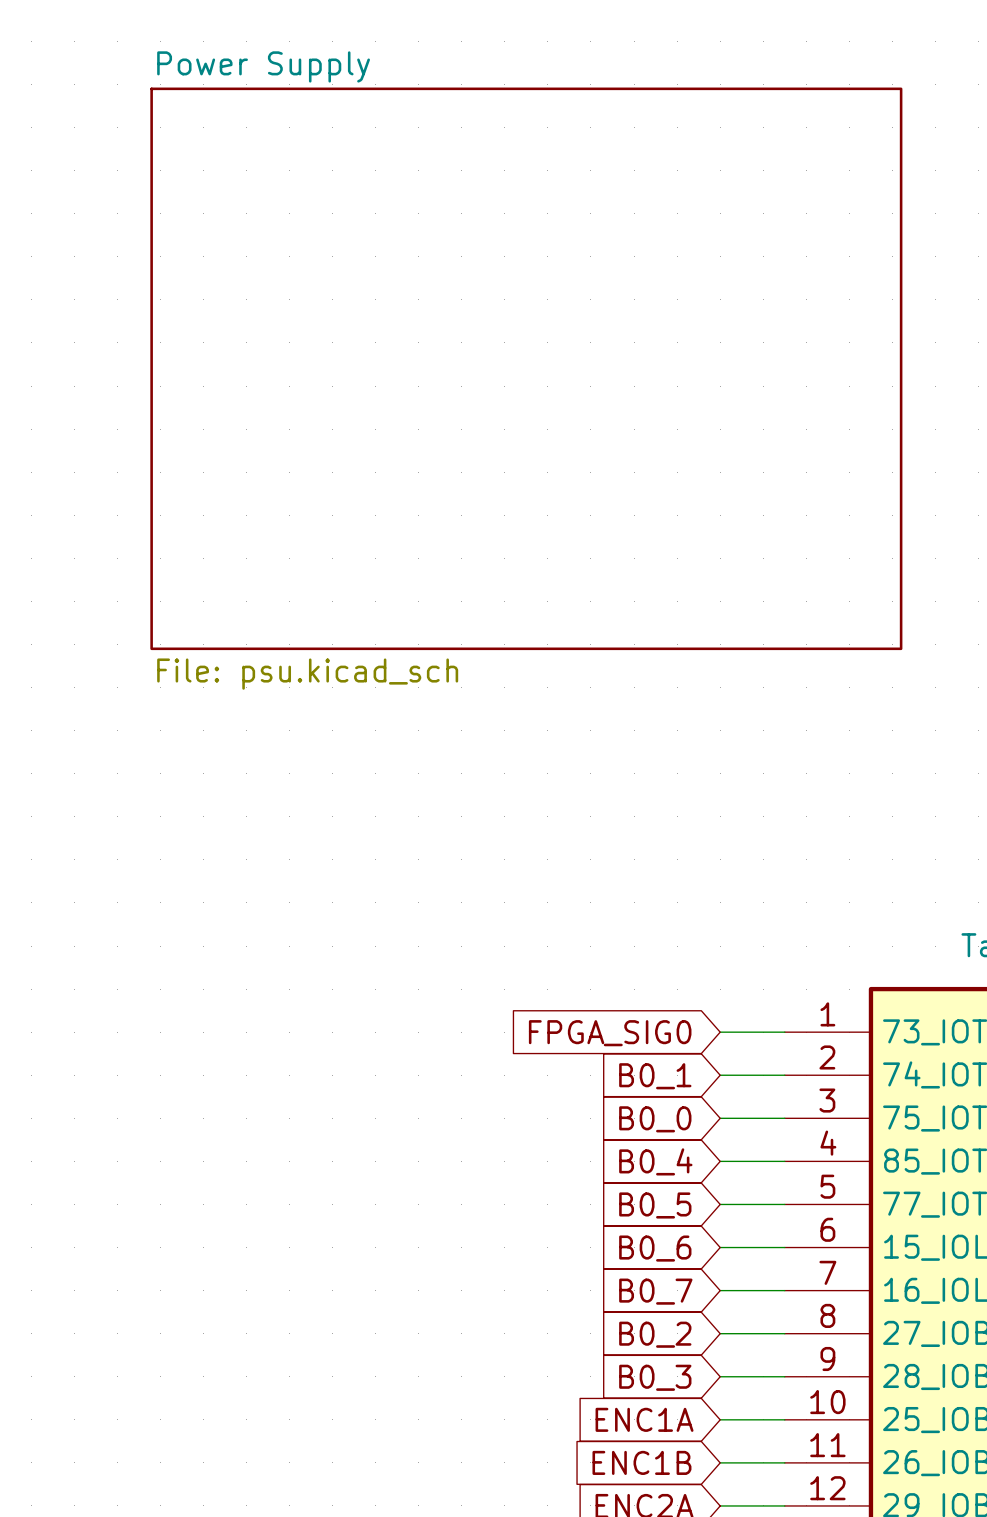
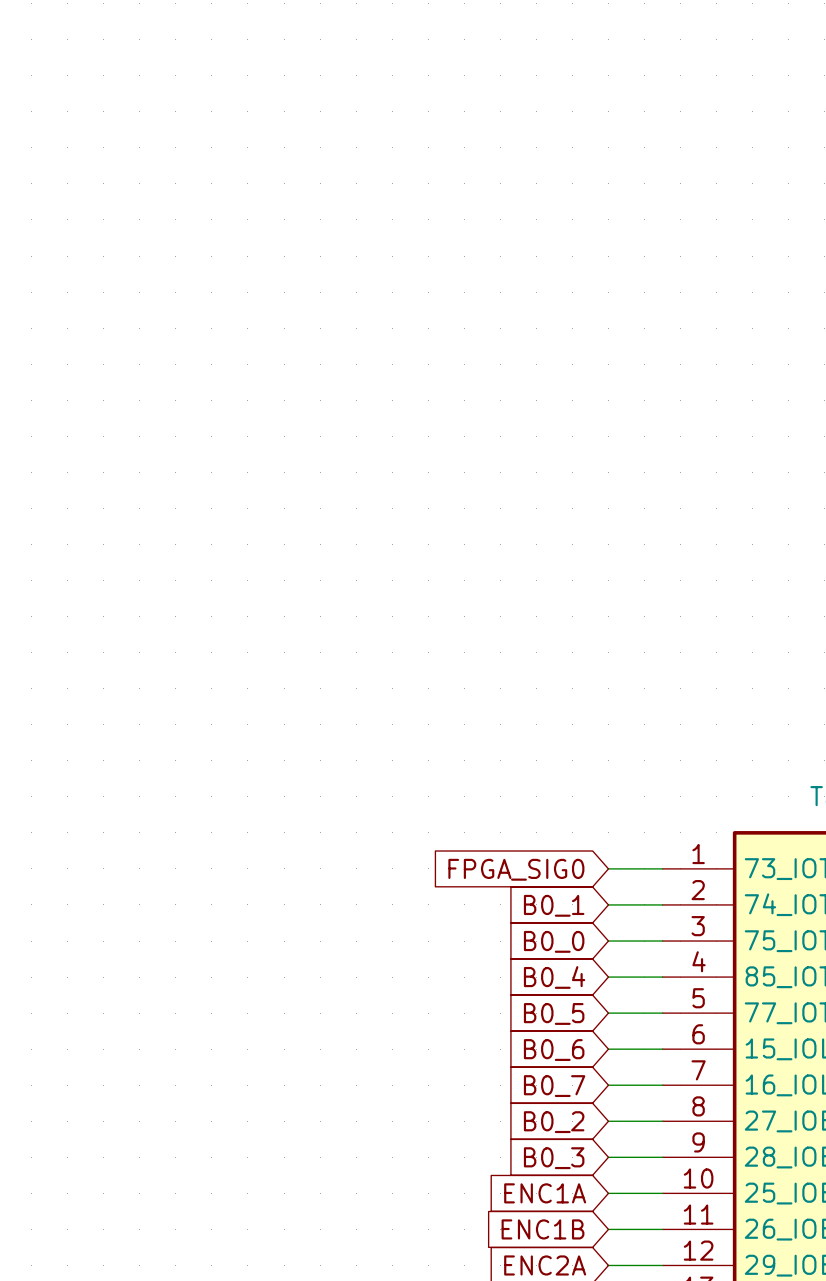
sheet Power Supply: File: psu.kicad_sch (526, 368) -> none

